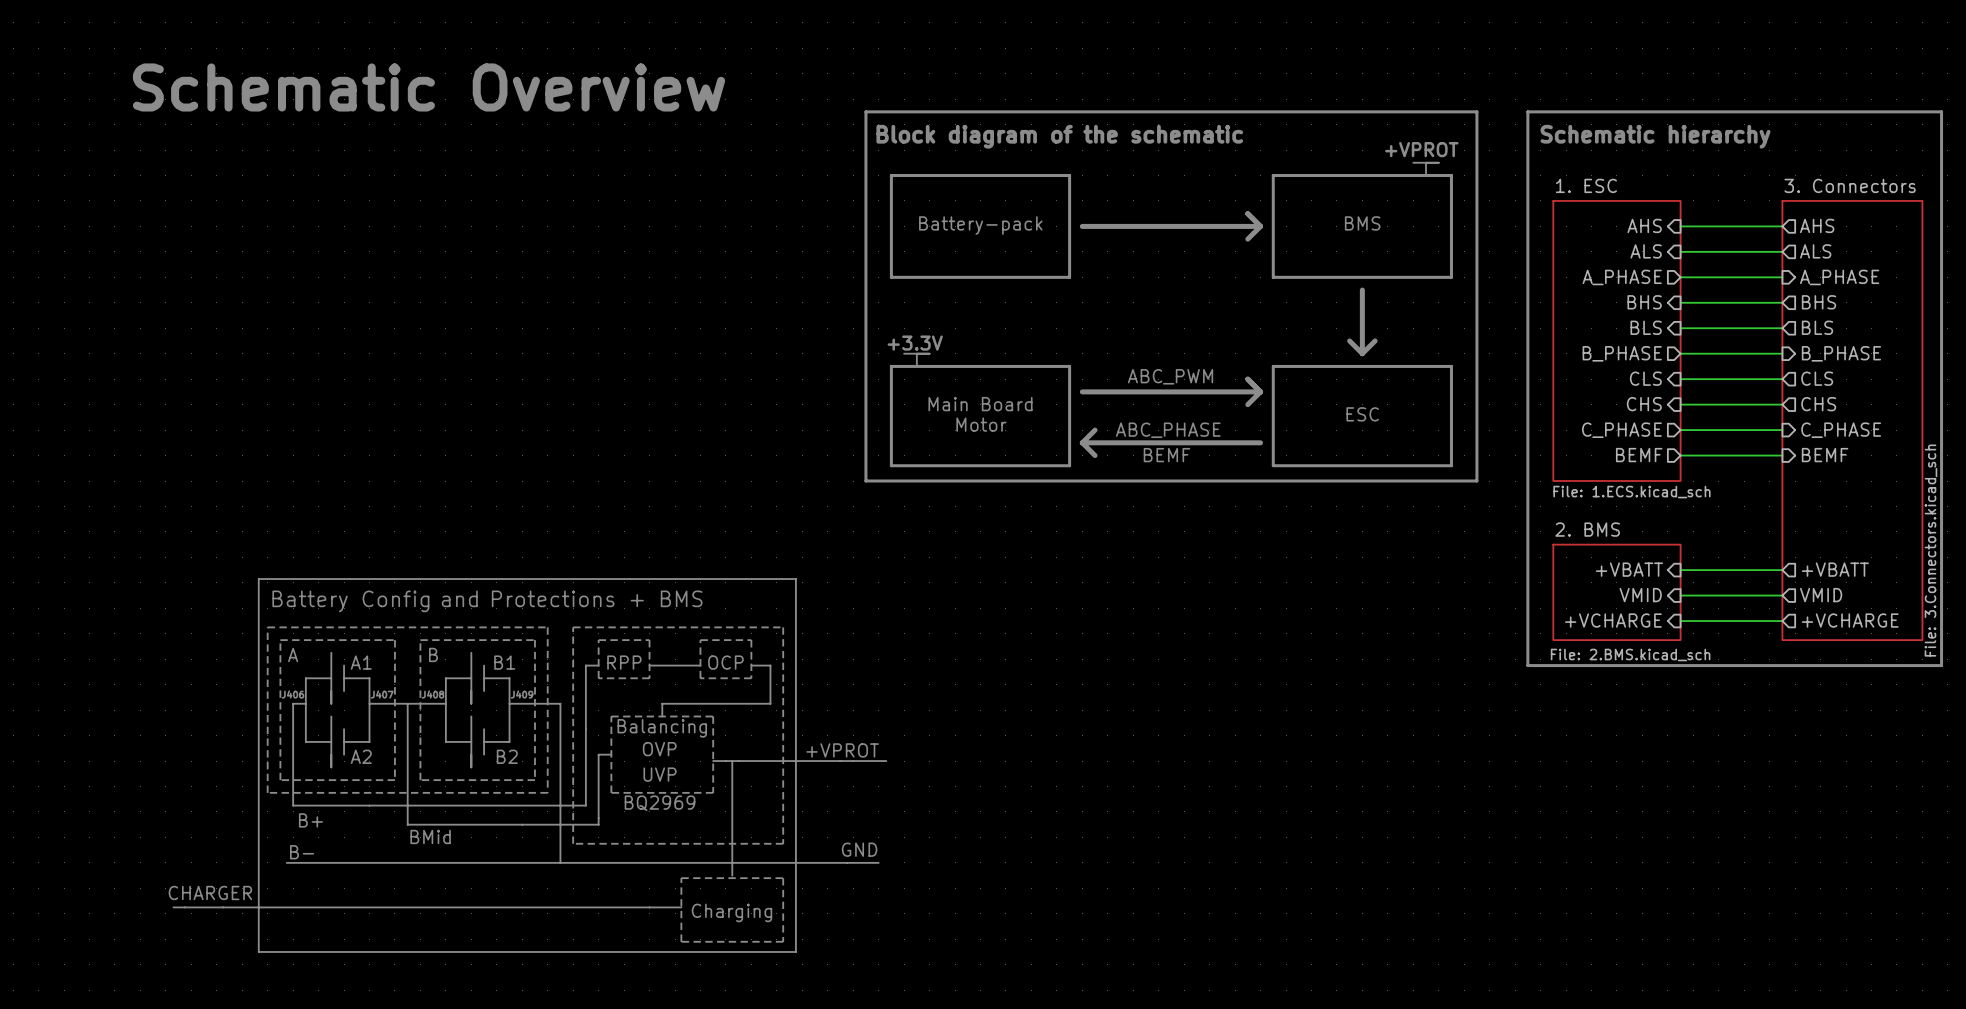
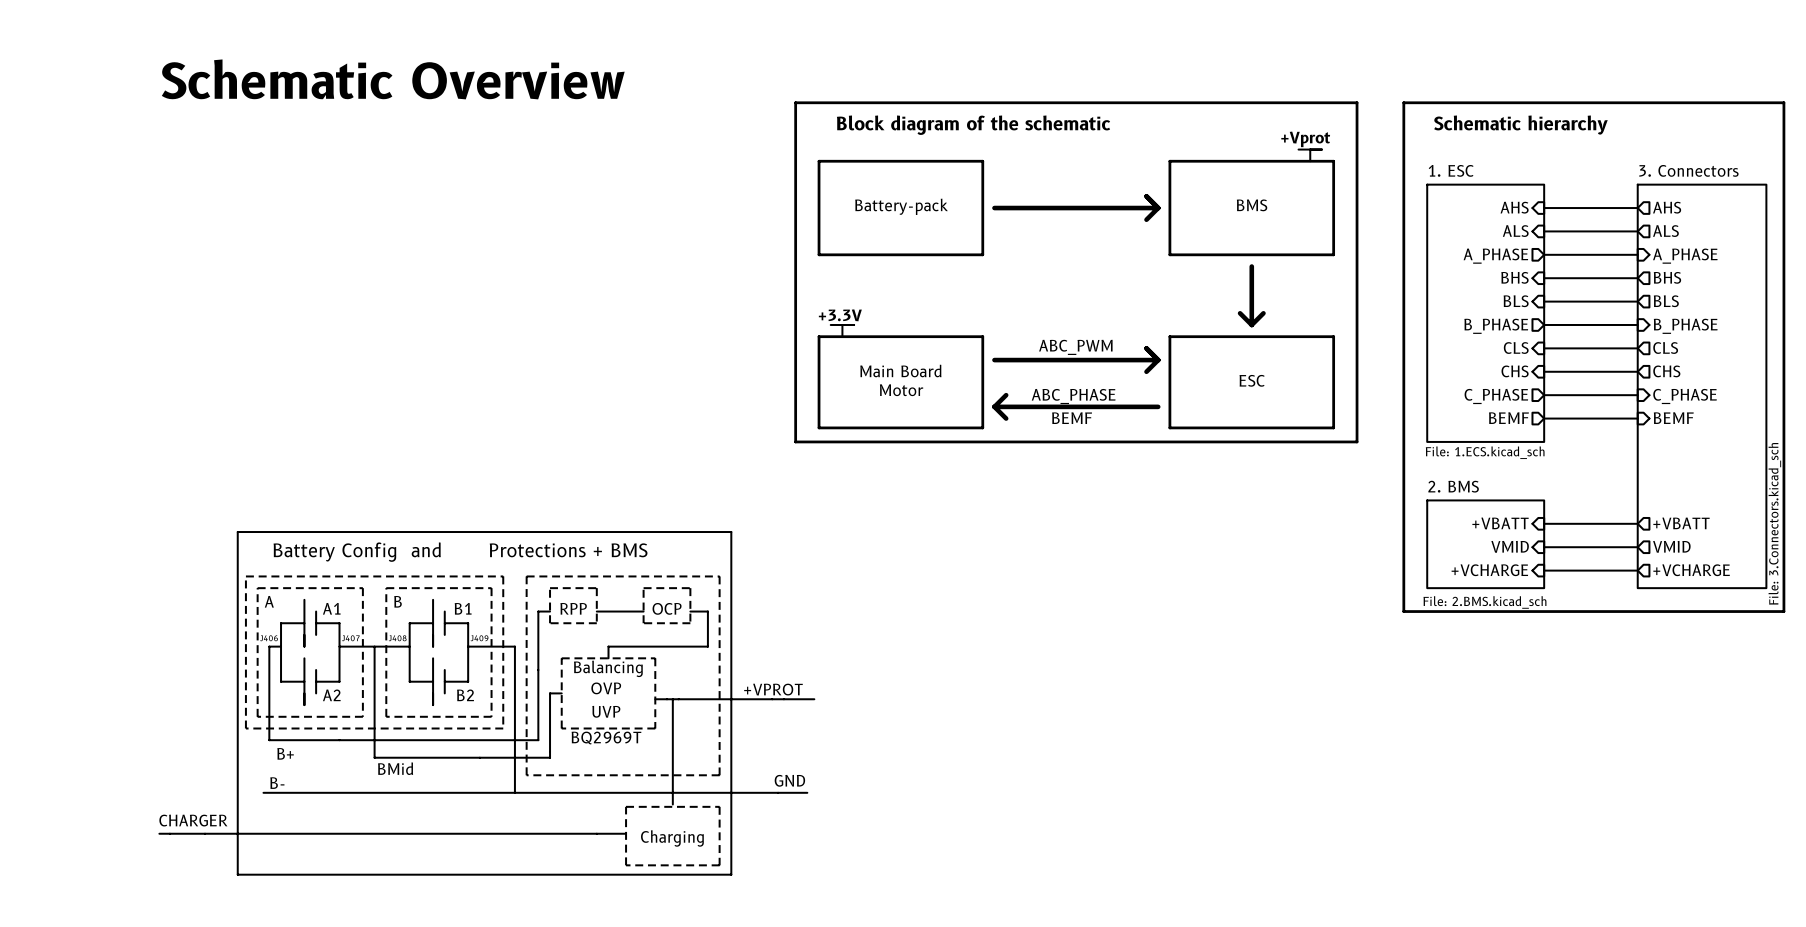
text: +VPROT (1421, 149) -> +Vprot (1305, 139)
text: BQ2969 (660, 803) -> BQ2969T (606, 738)

